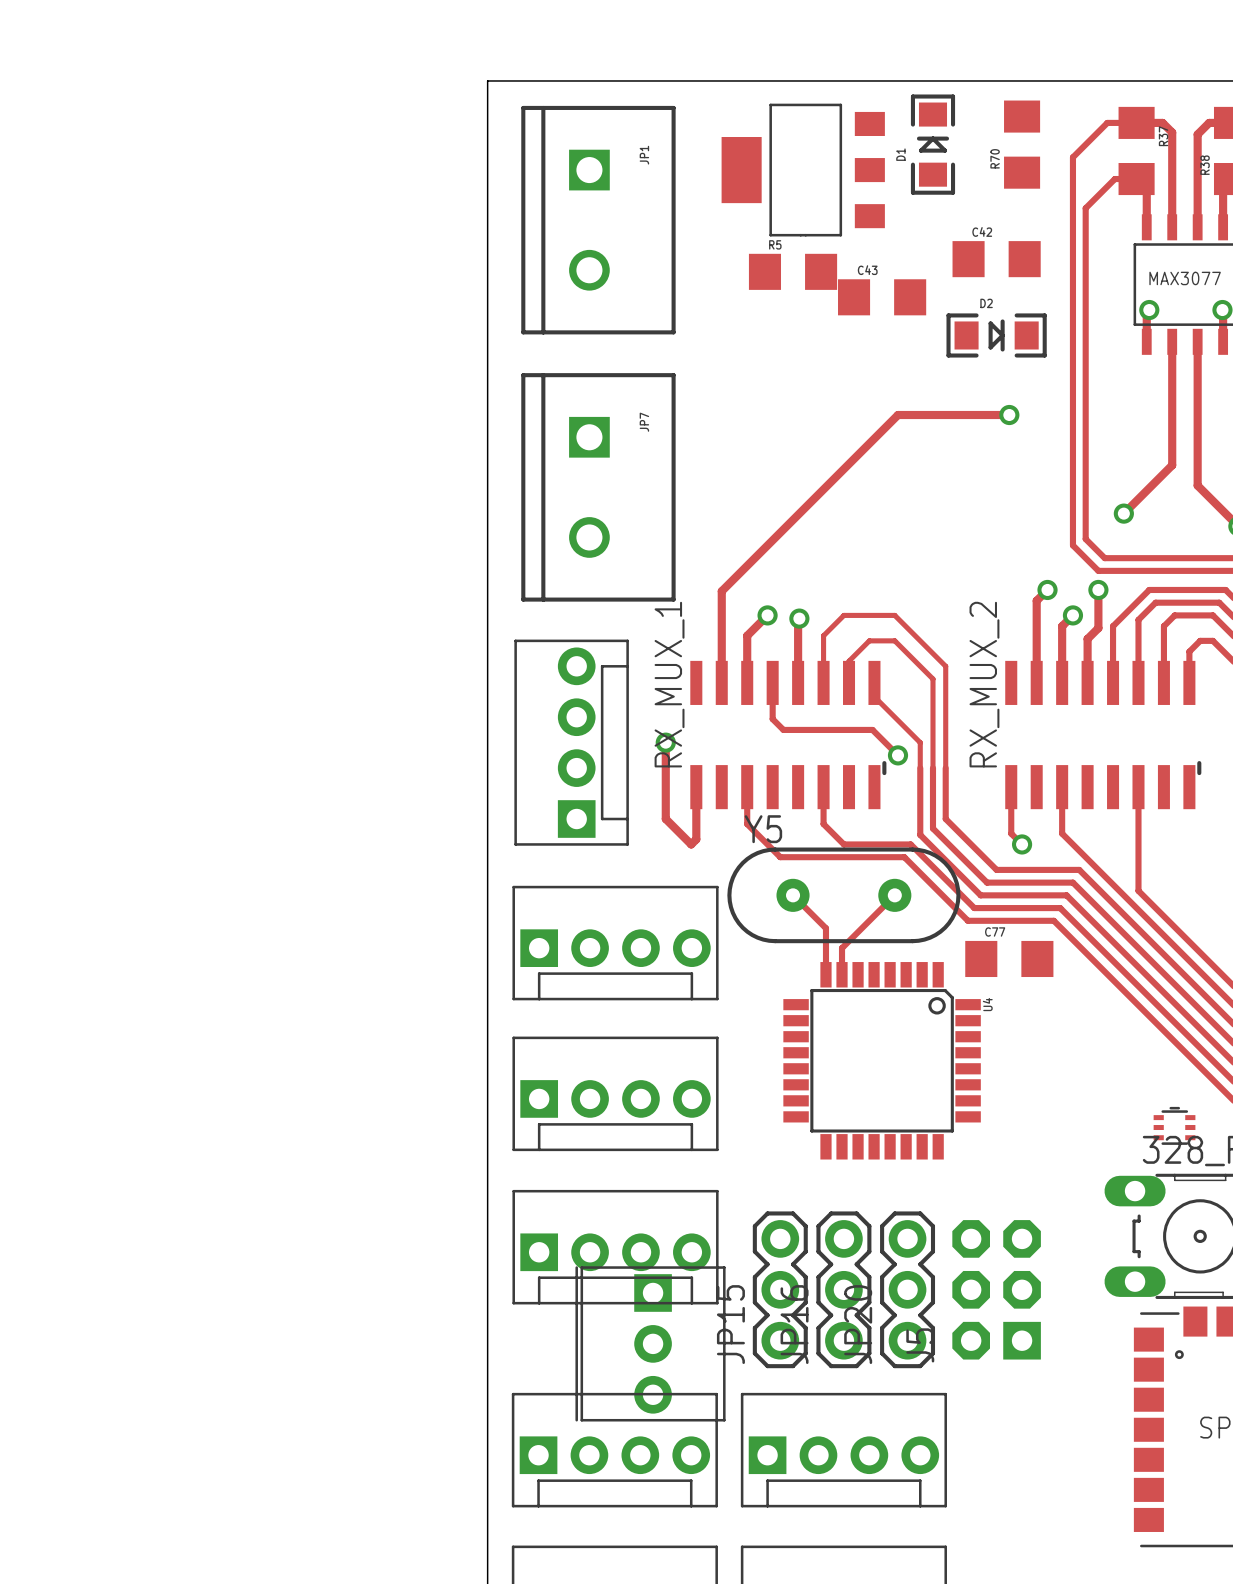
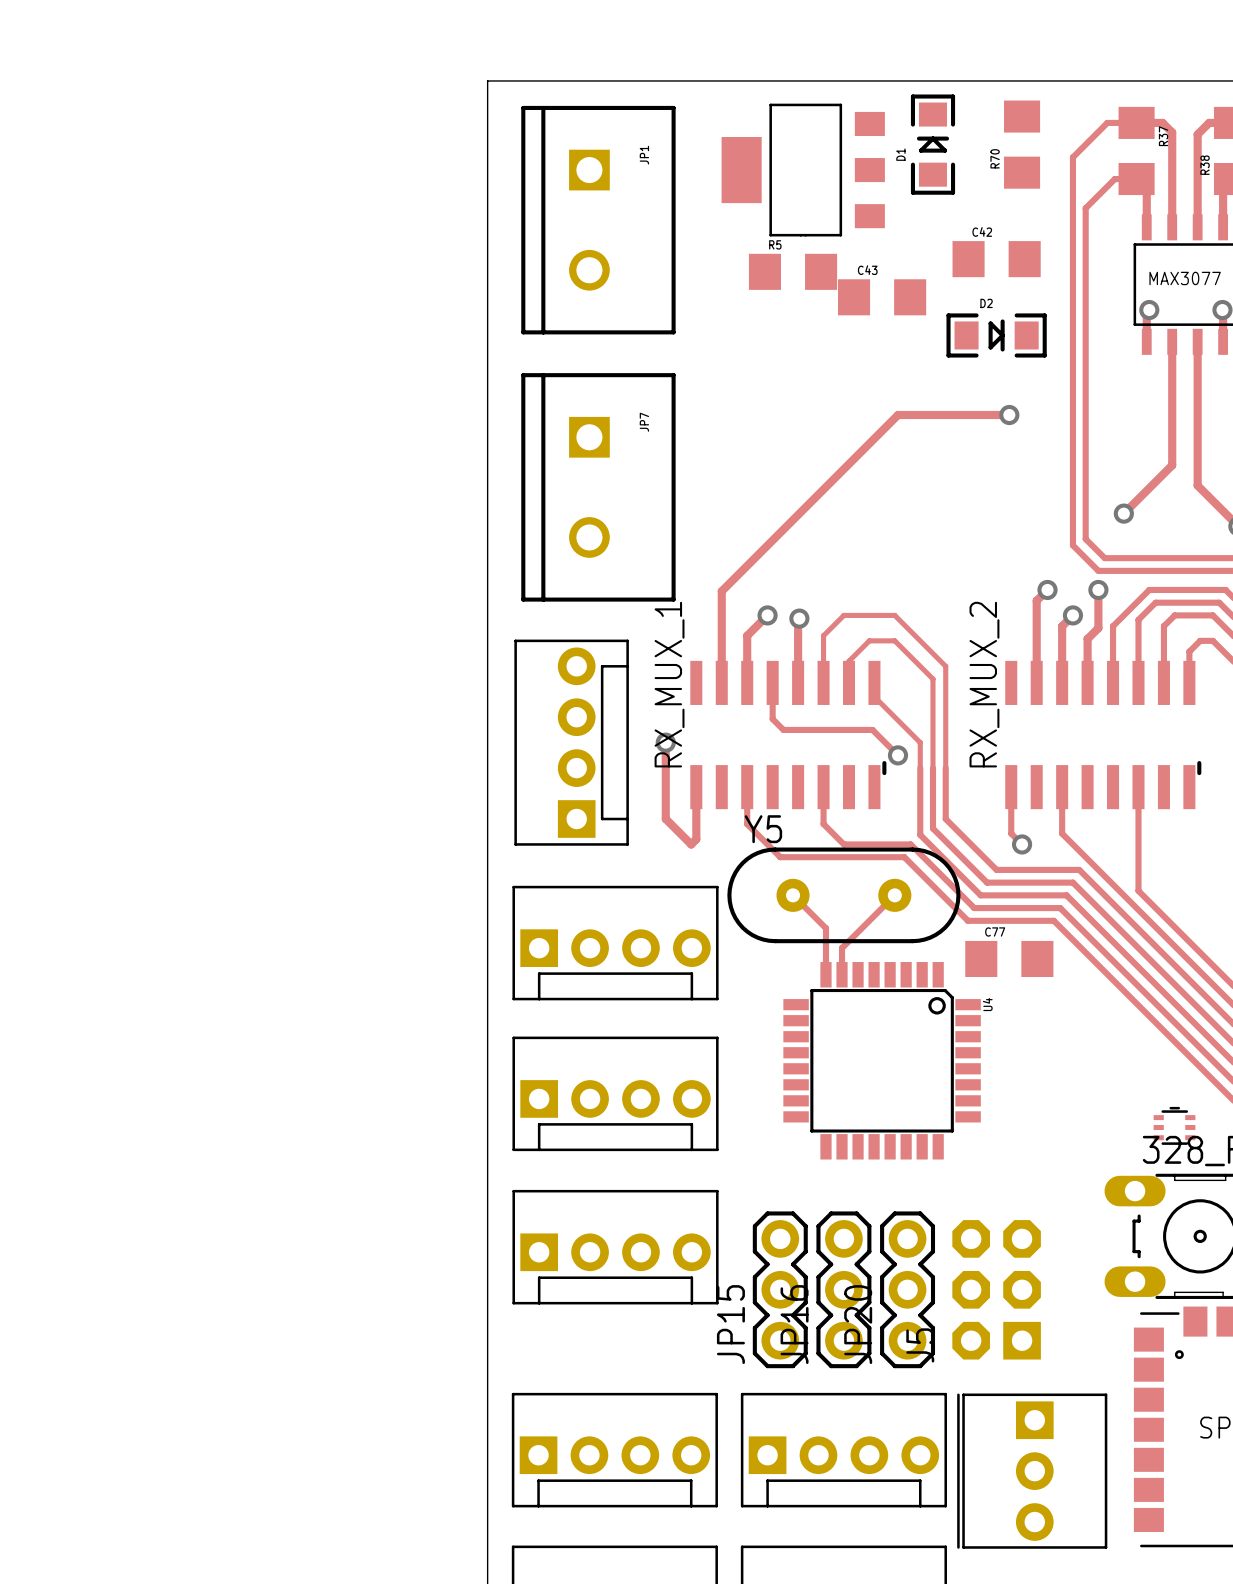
part position: (650, 1343) -> (1032, 1471)

